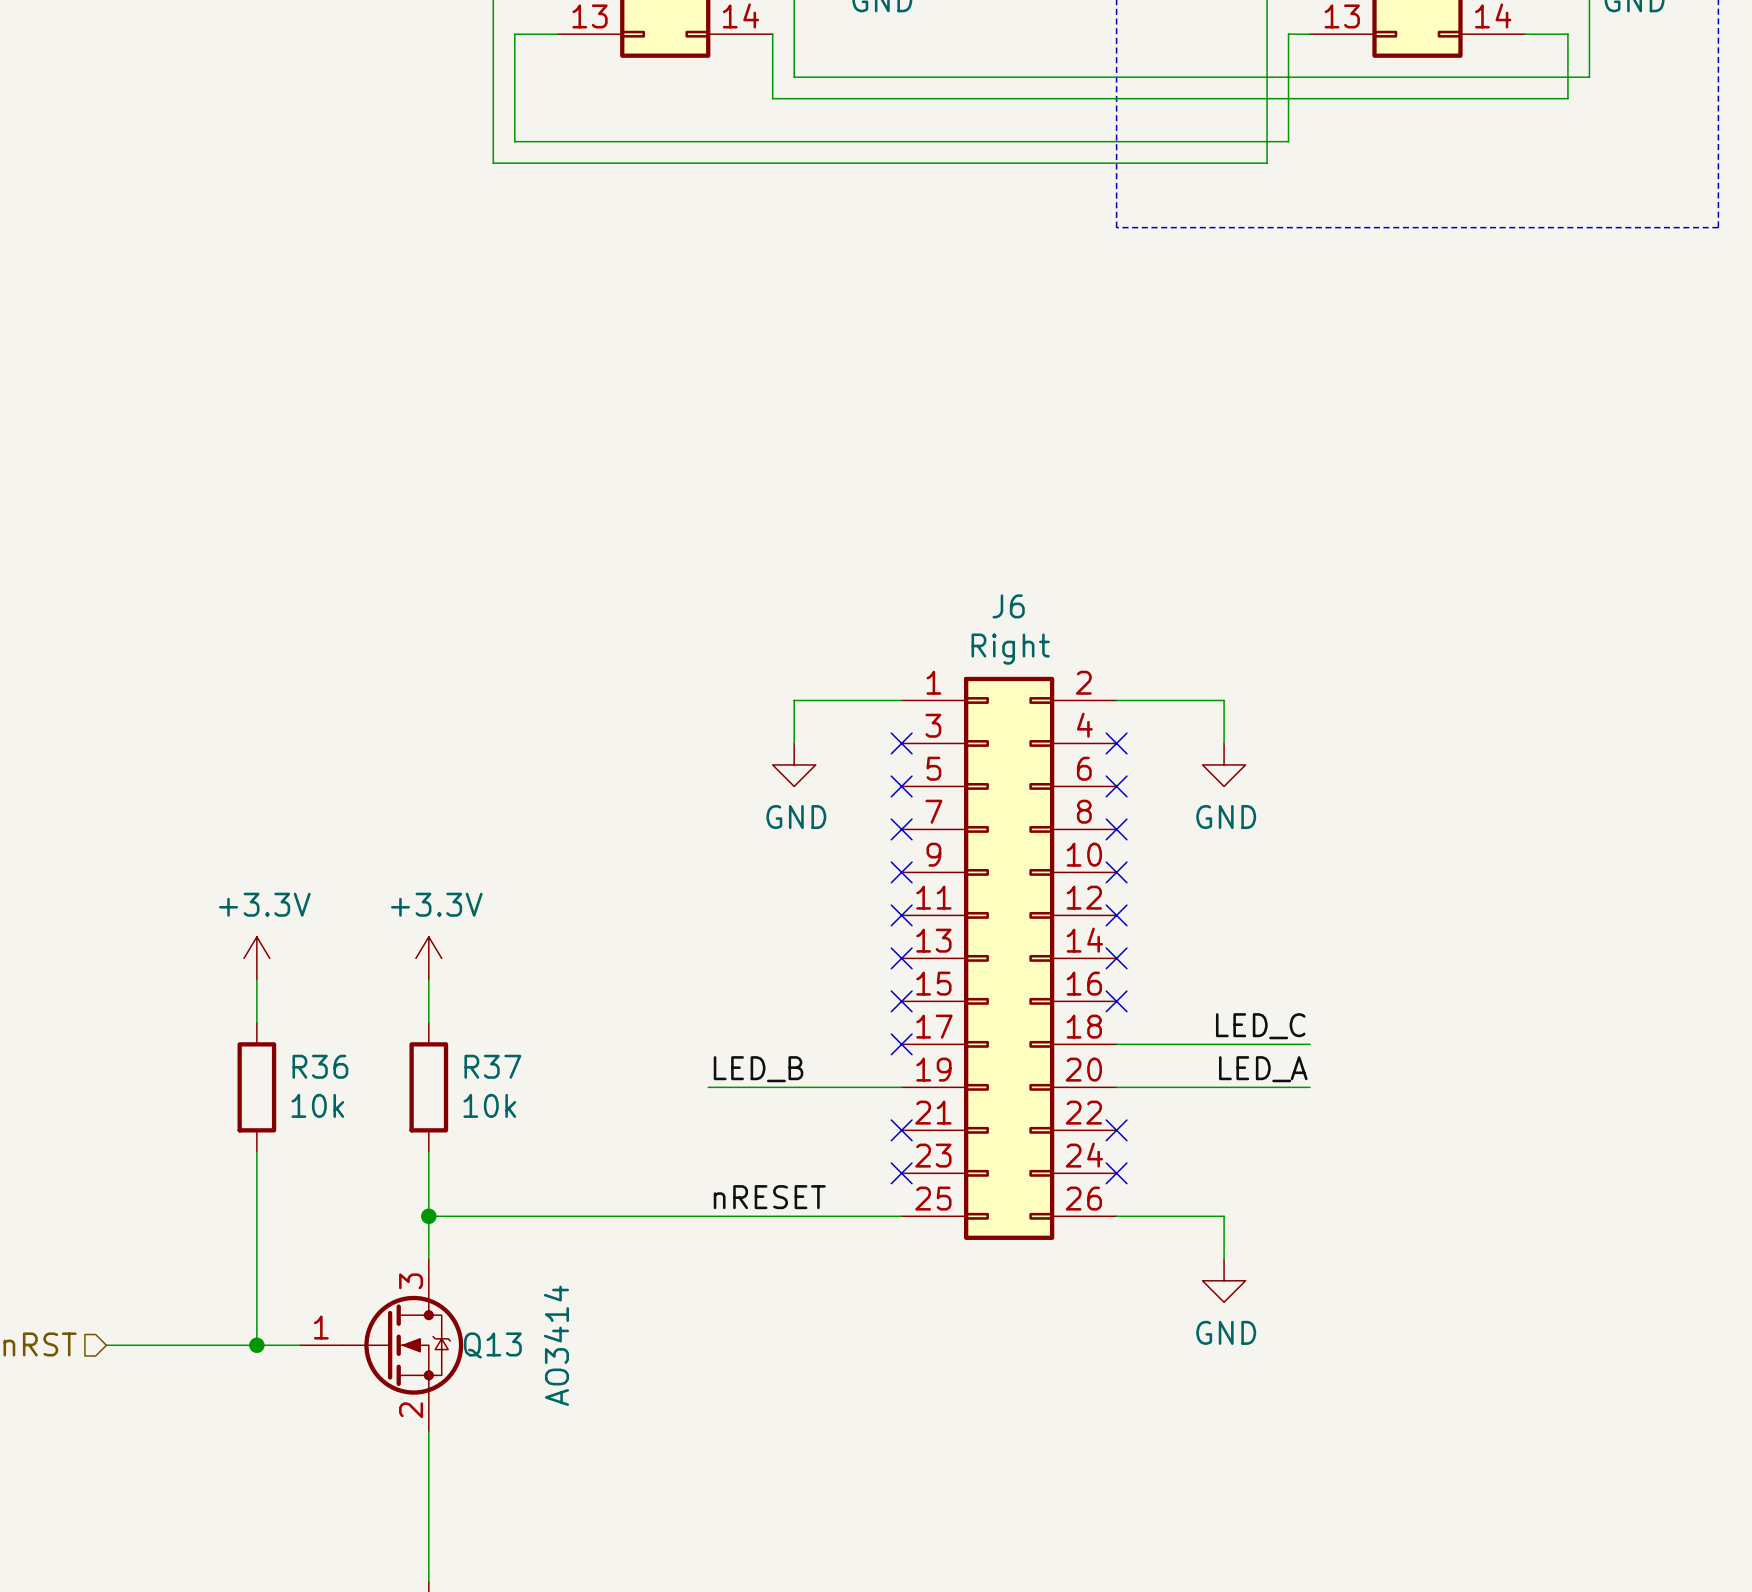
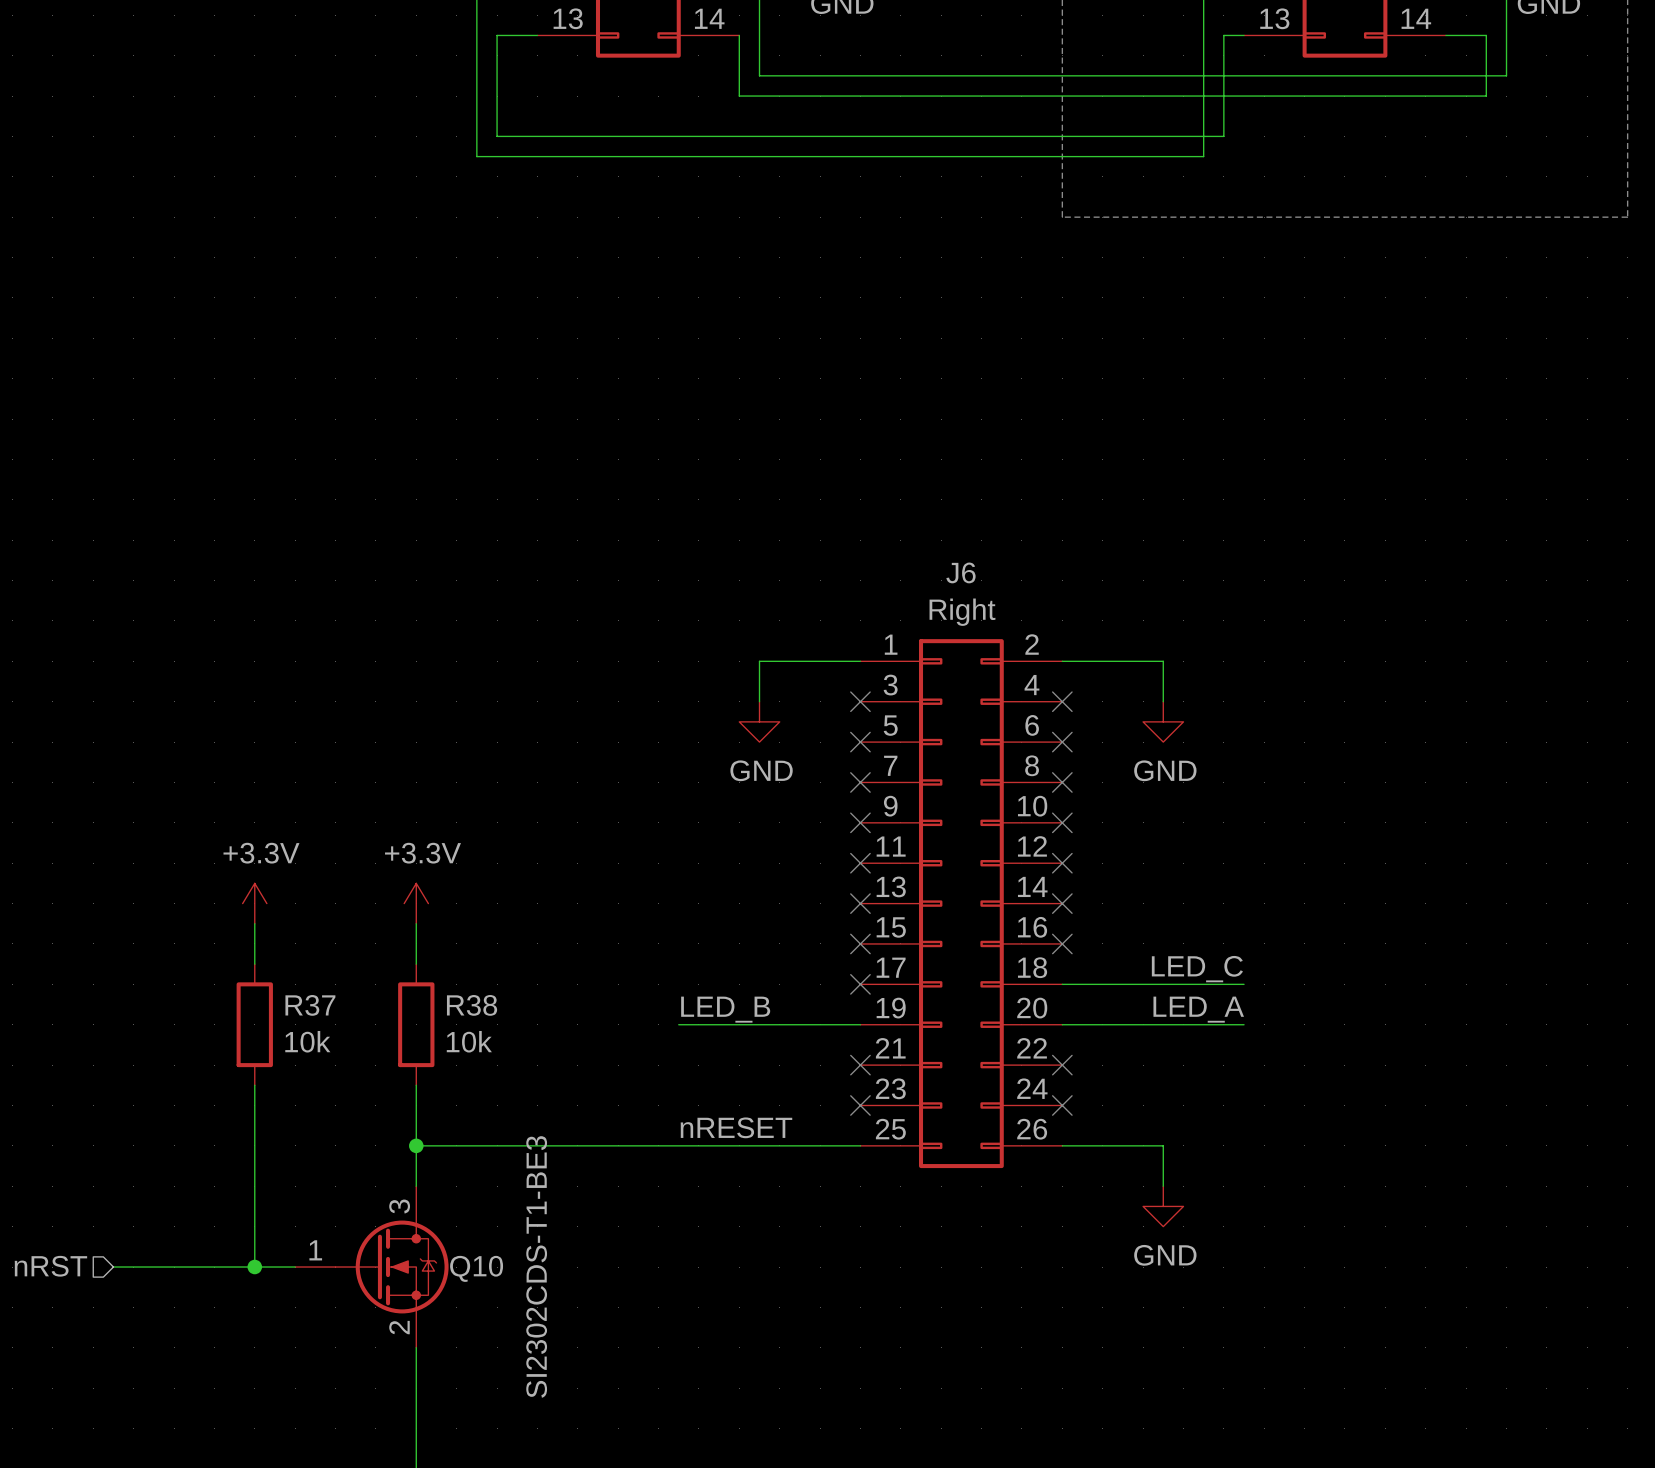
R36 name: R36 (320, 1066) -> R37 (310, 1005)
R37 name: R37 (492, 1066) -> R38 (472, 1005)
Q13 name: Q13 (492, 1345) -> Q10 (476, 1268)
Q13 value: AO3414 (556, 1345) -> SI2302CDS-T1-BE3 (536, 1266)

